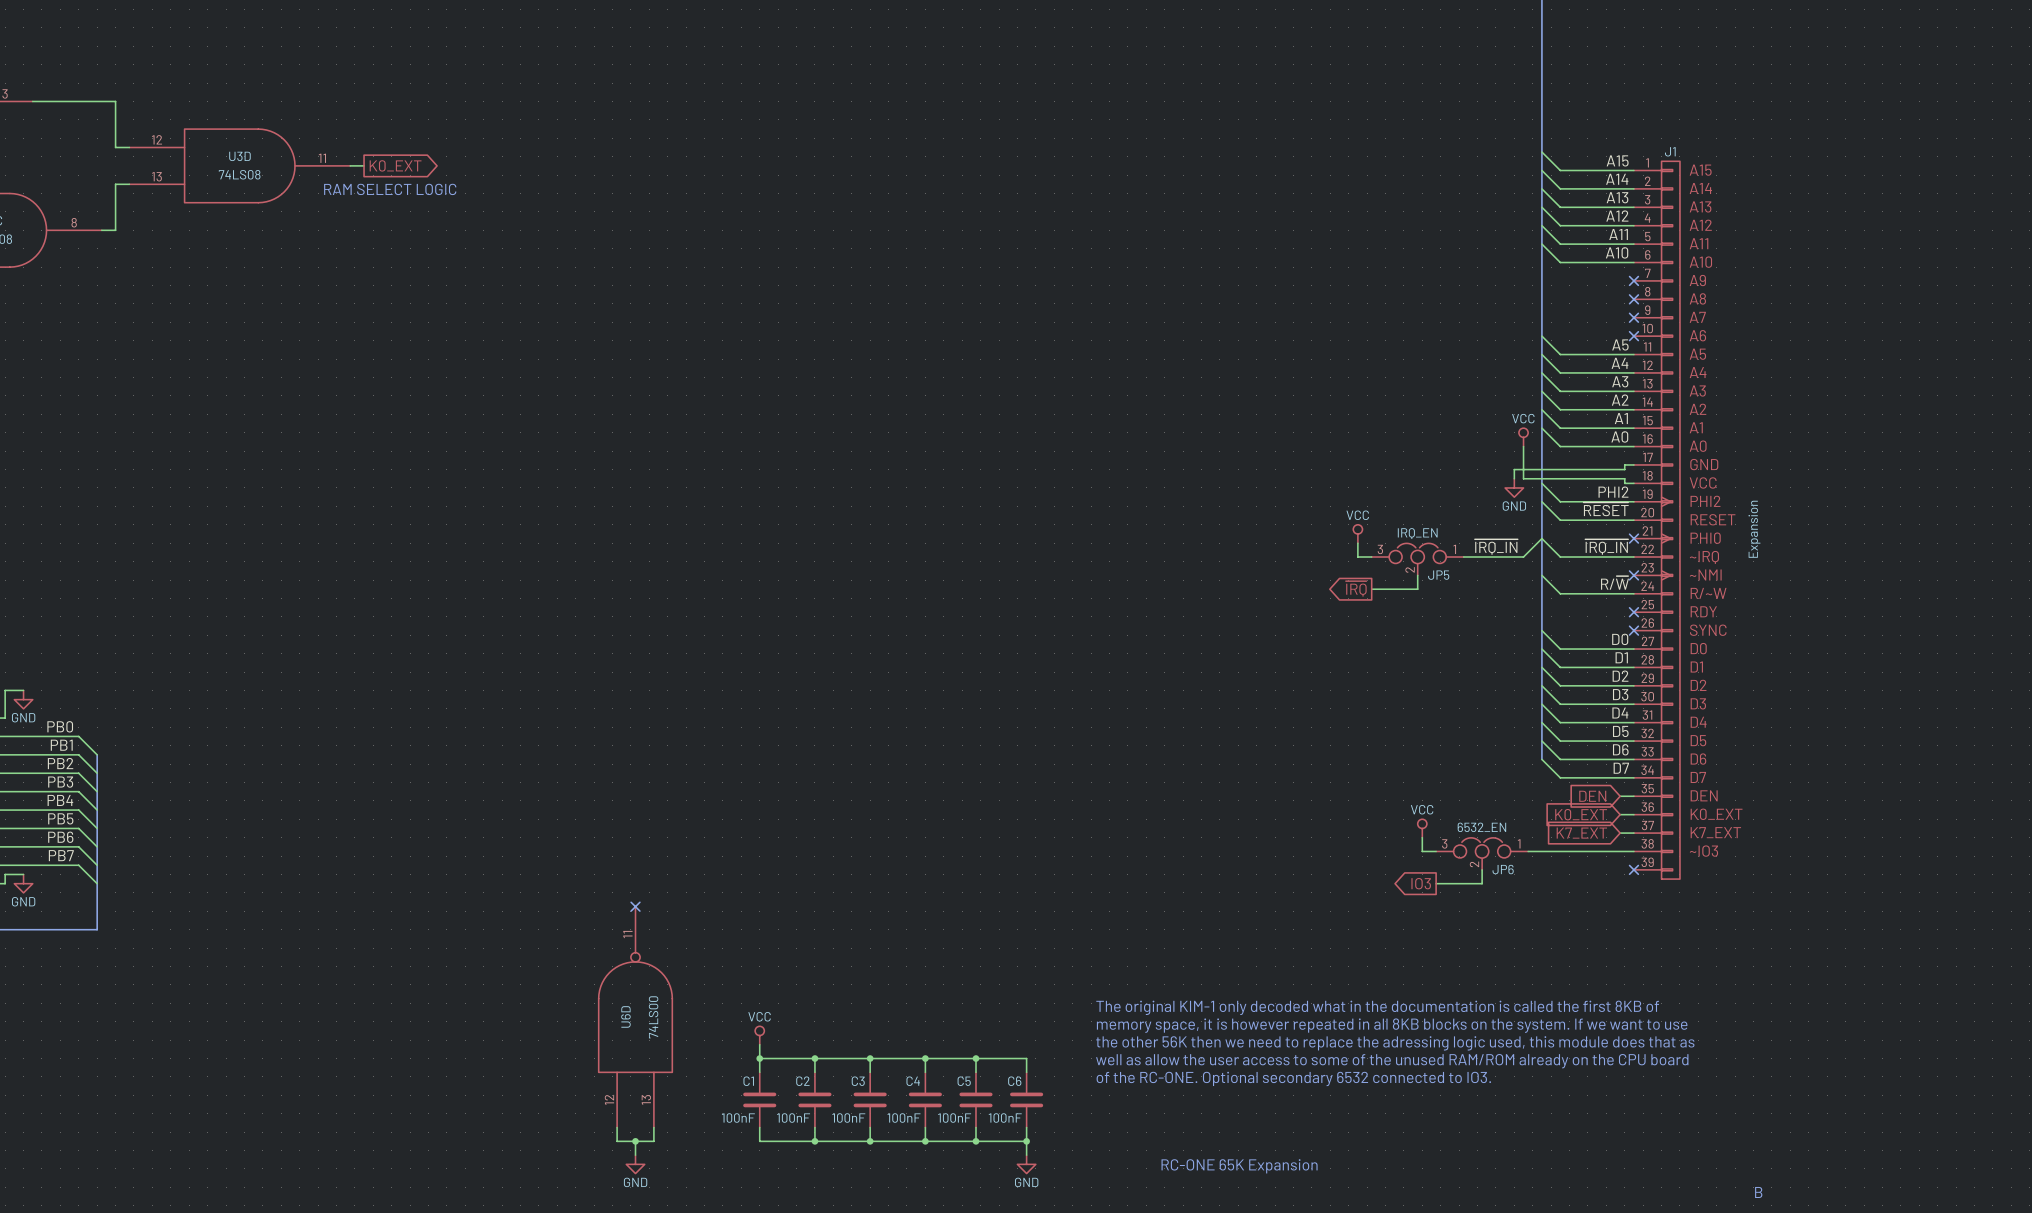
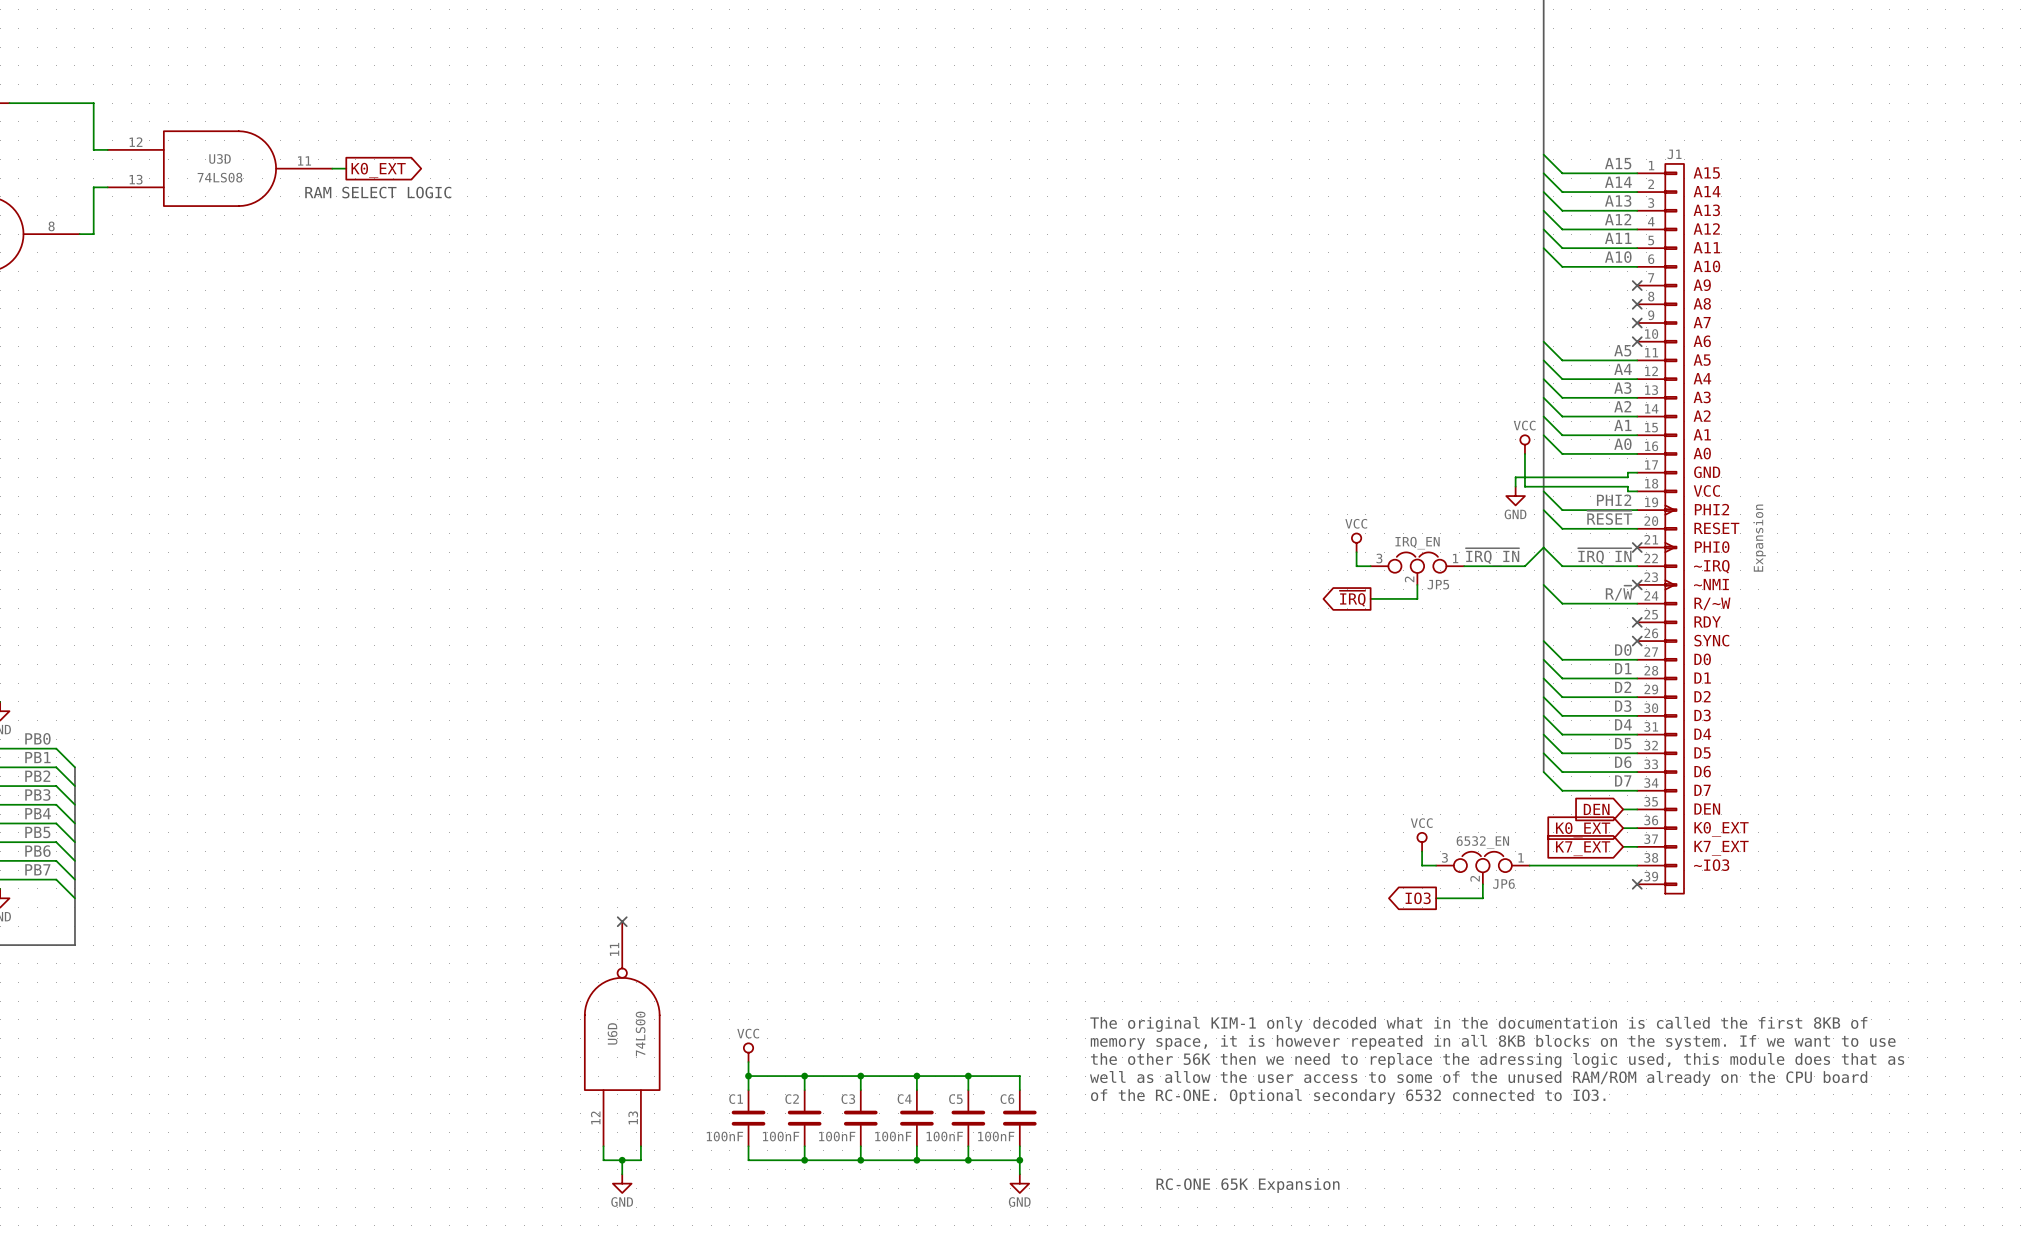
text: B (1758, 1192) -> none

